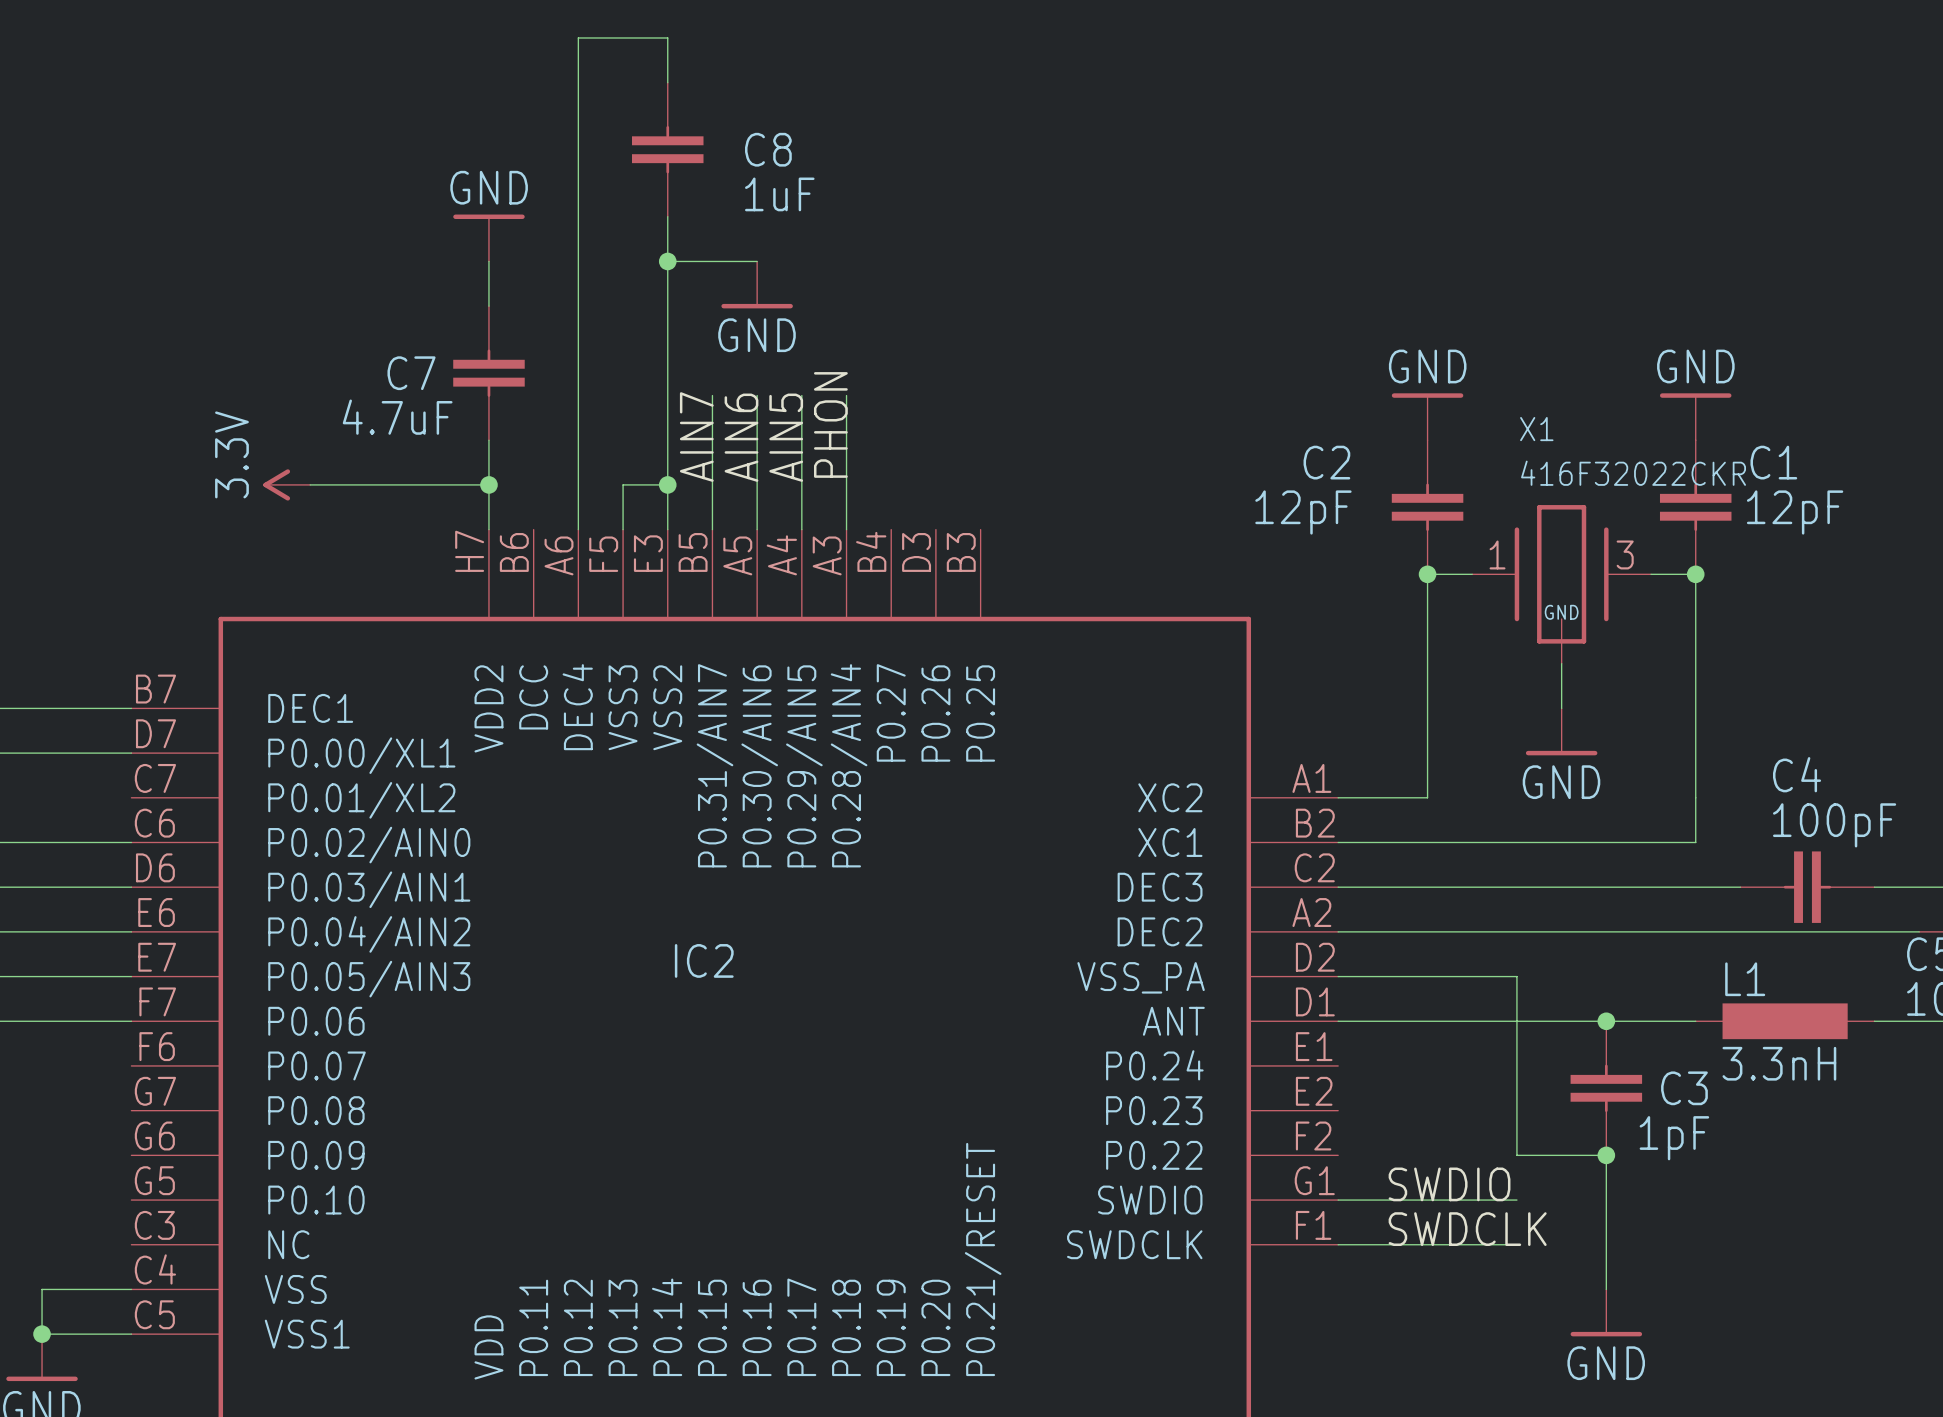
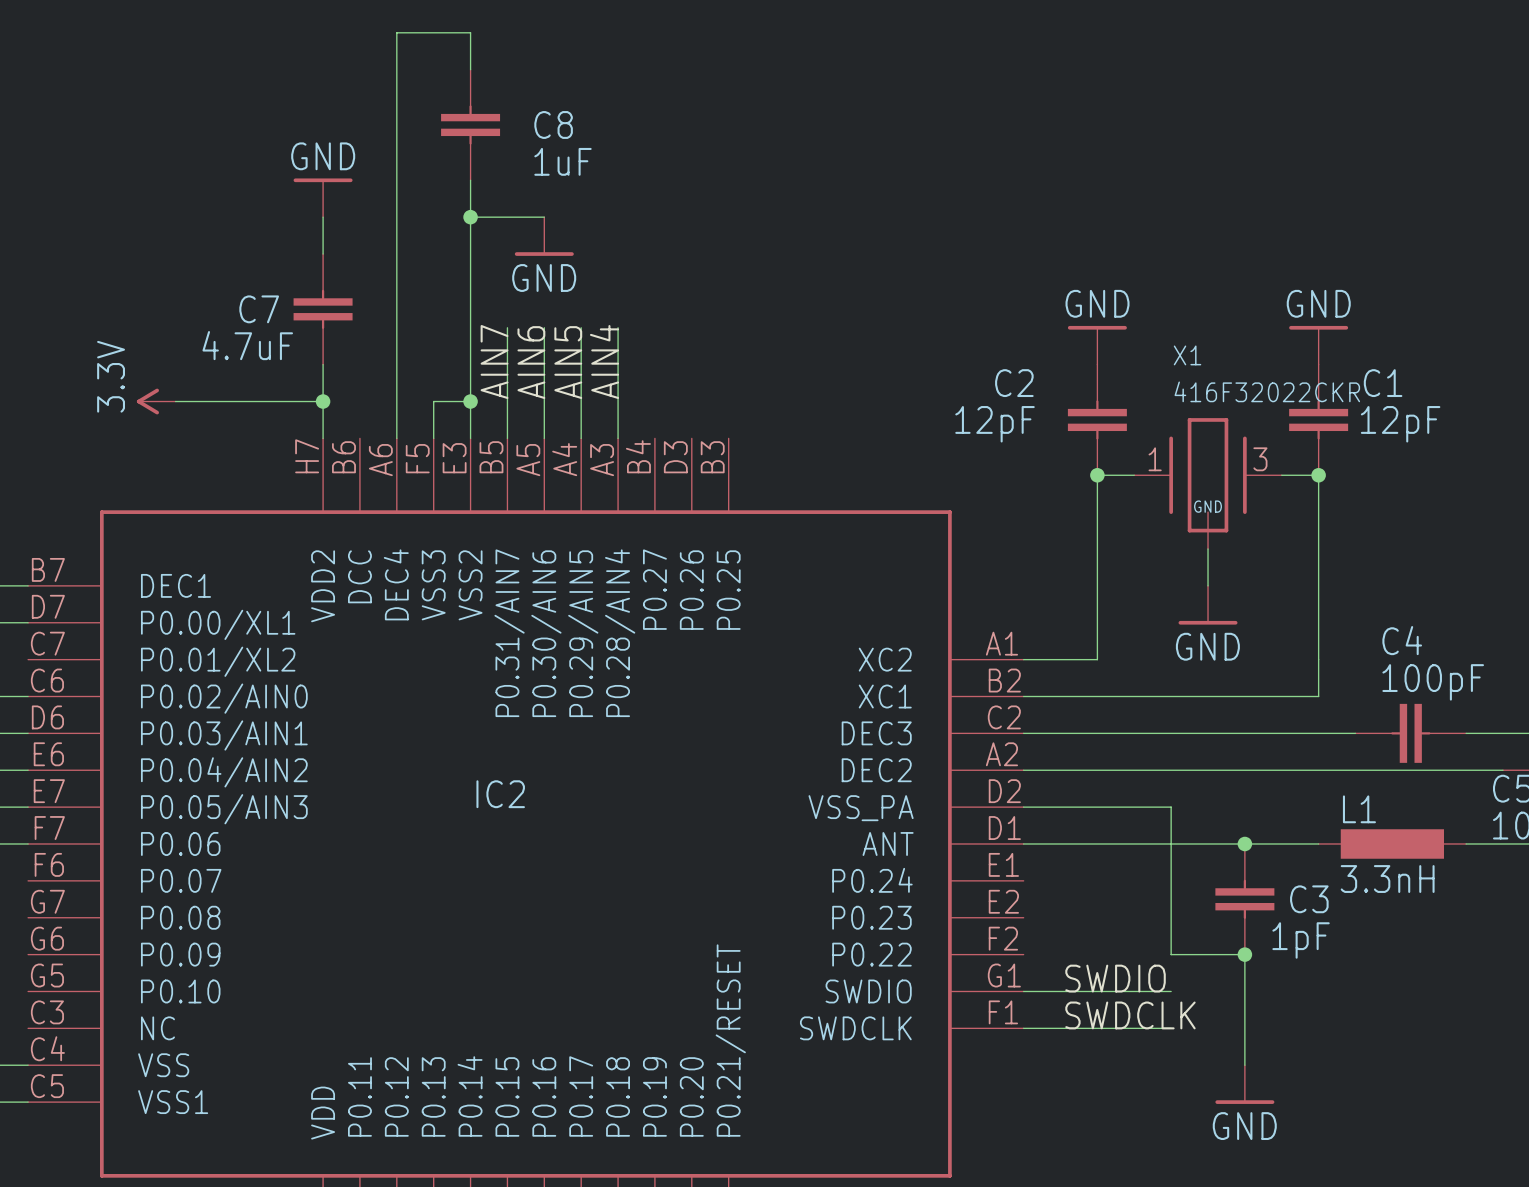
label: PHON (830, 424) -> AIN4 (604, 362)

